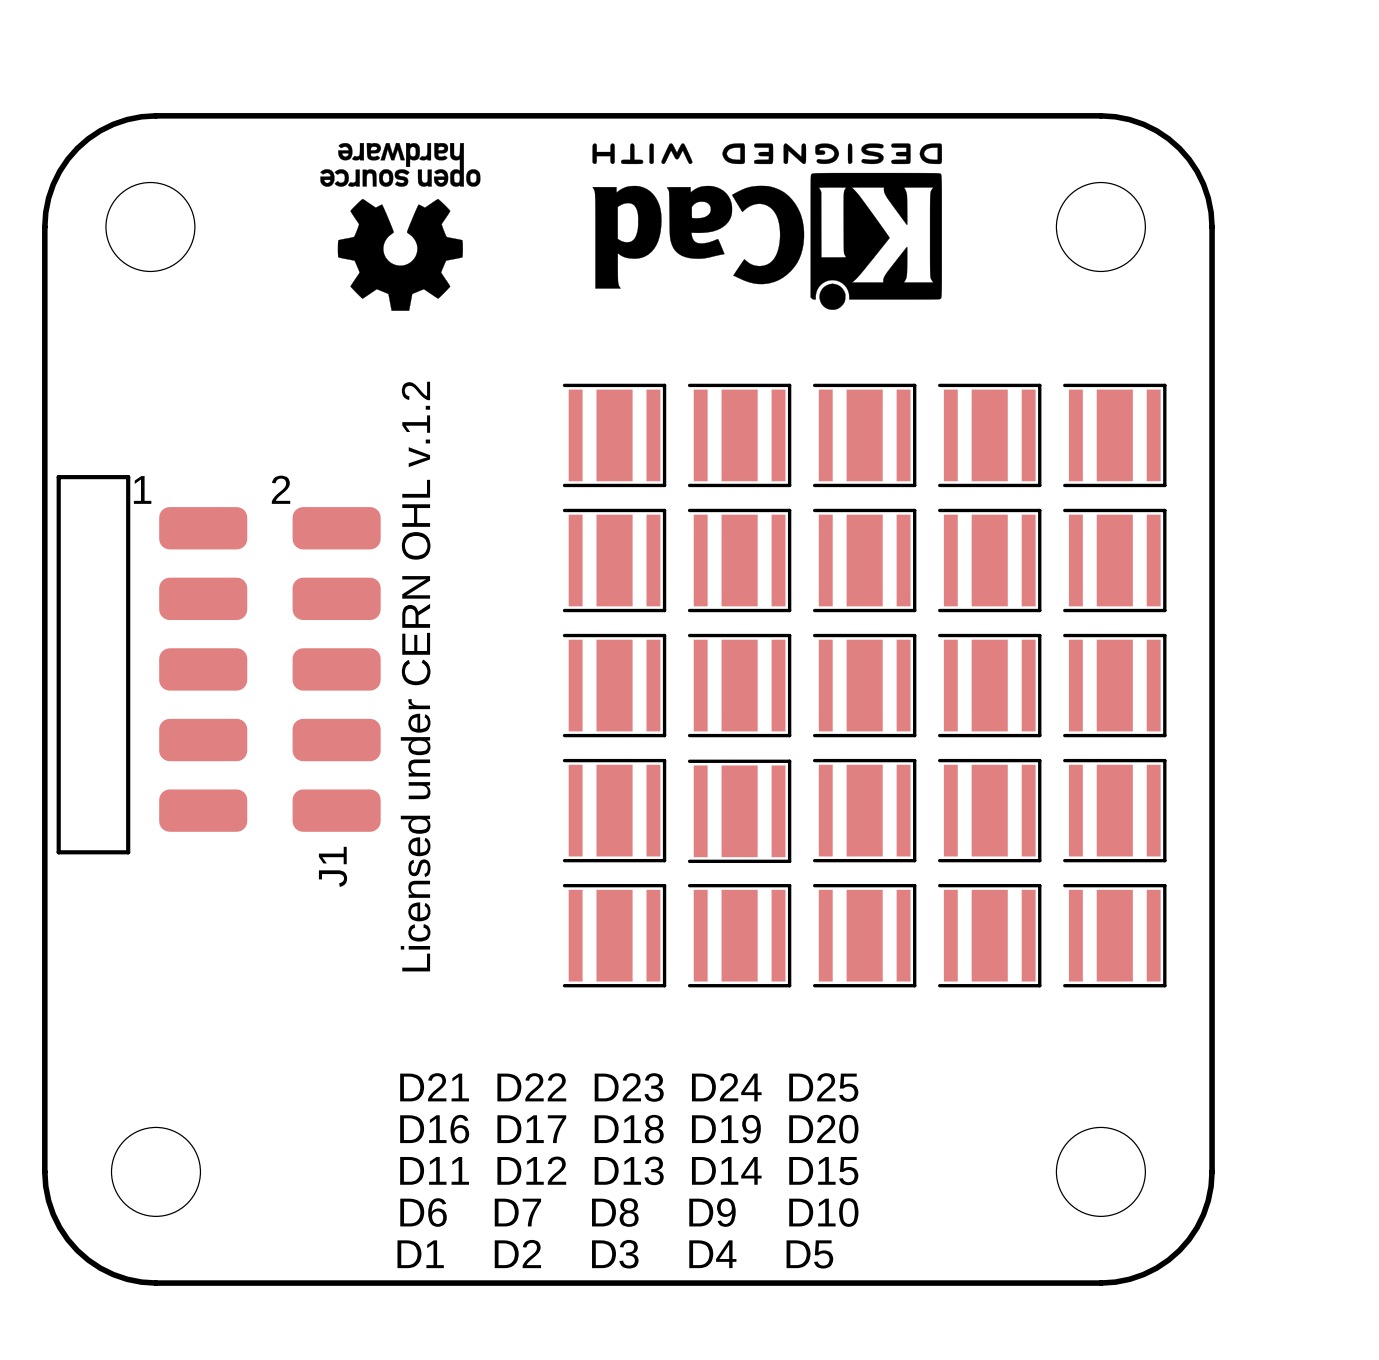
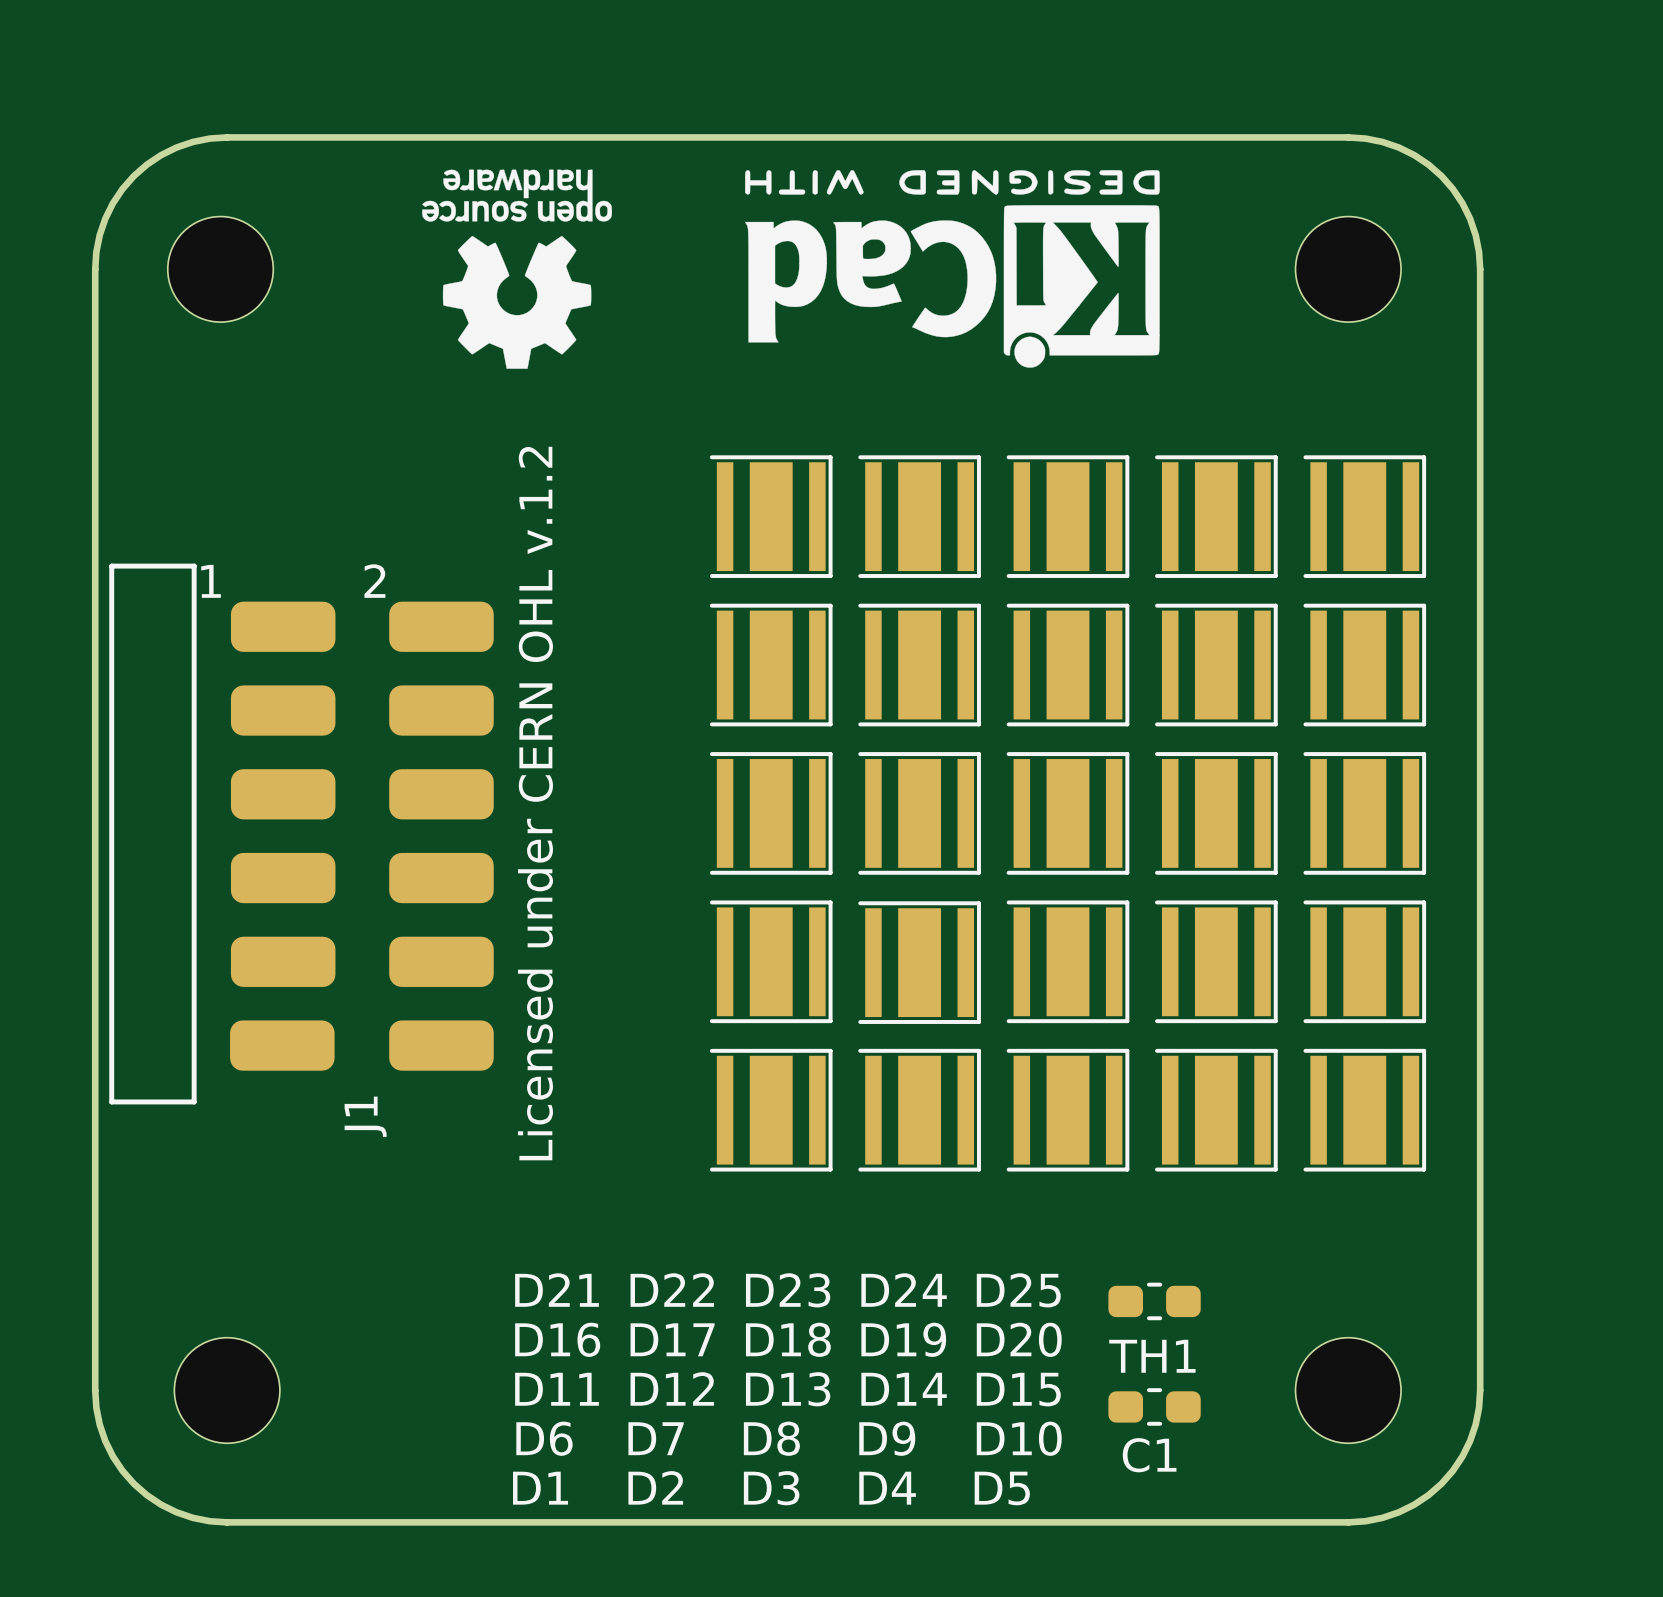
J1 footprint: [56, 475, 381, 855] -> [109, 563, 494, 1105]
J1 name position: J1 (333, 866) -> J1 (365, 1116)
TH1: none -> (1154, 1301)
C1: none -> (1154, 1406)

